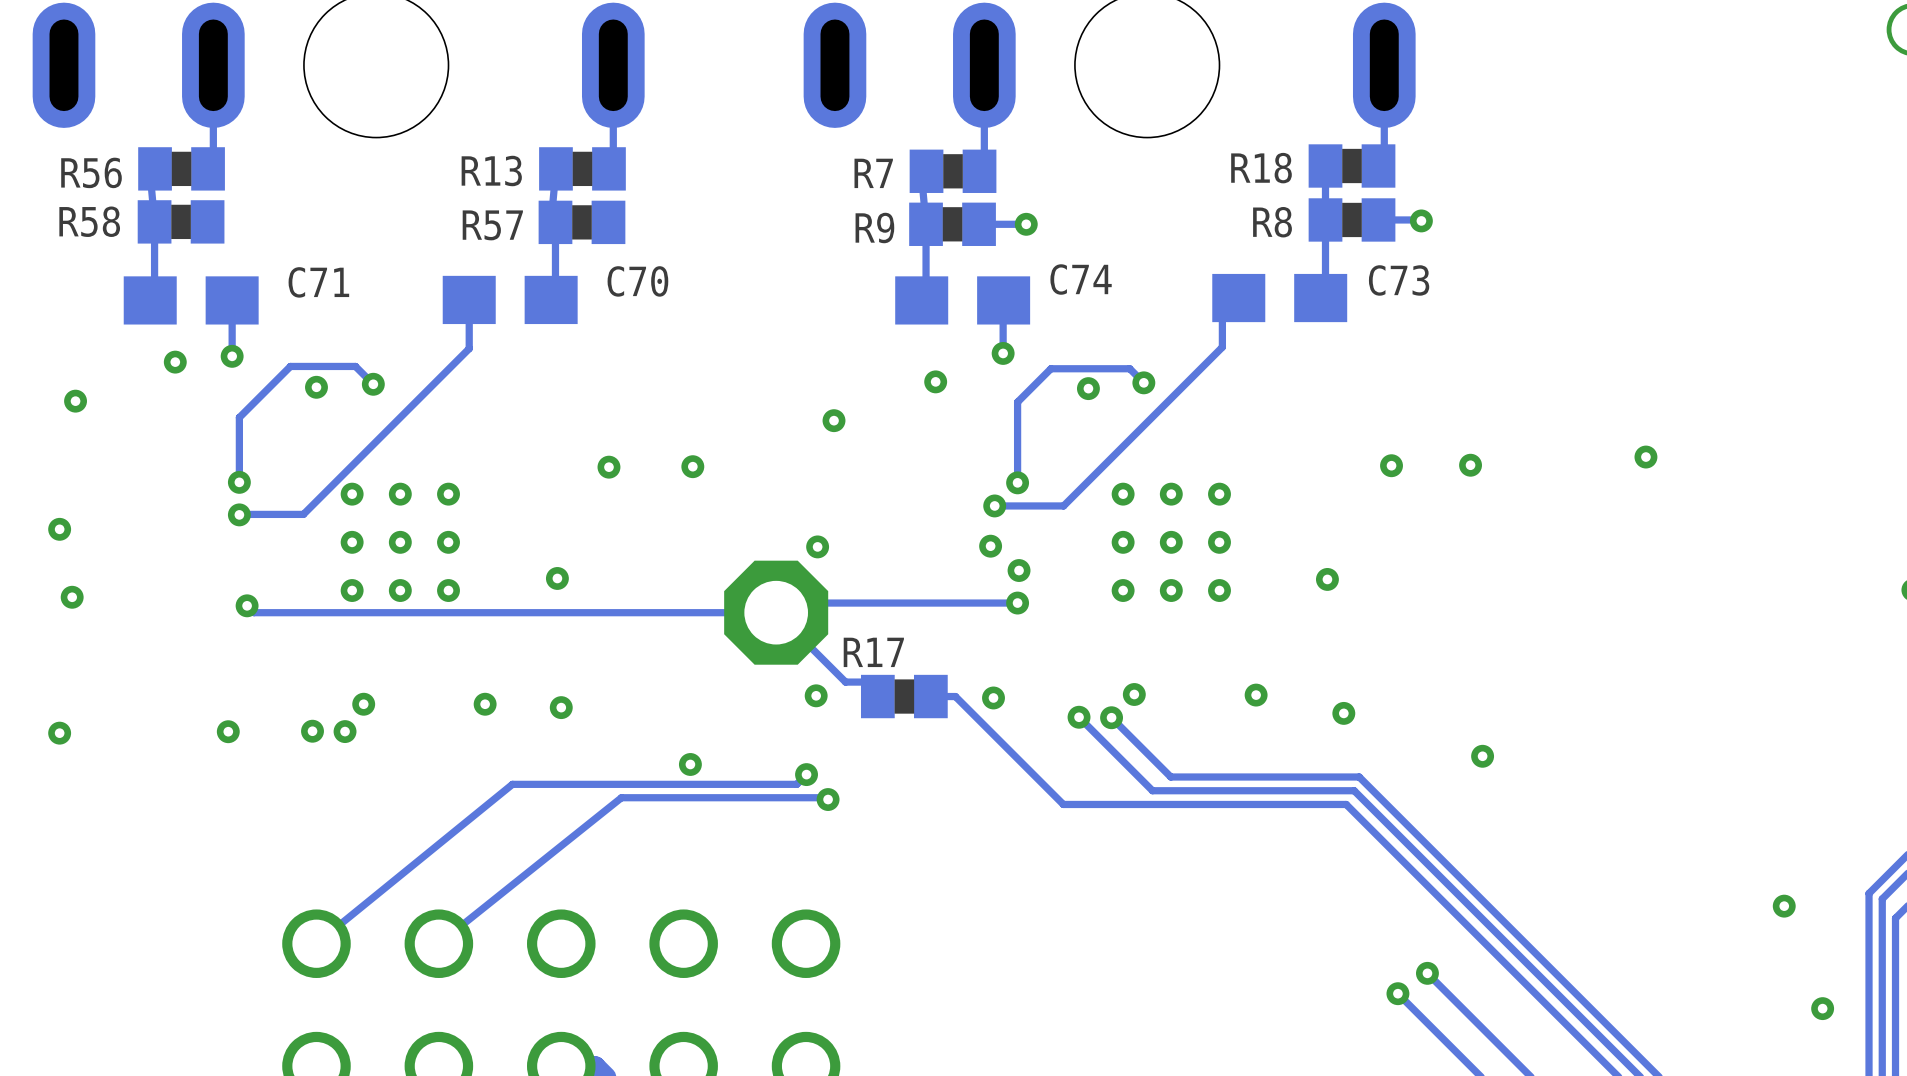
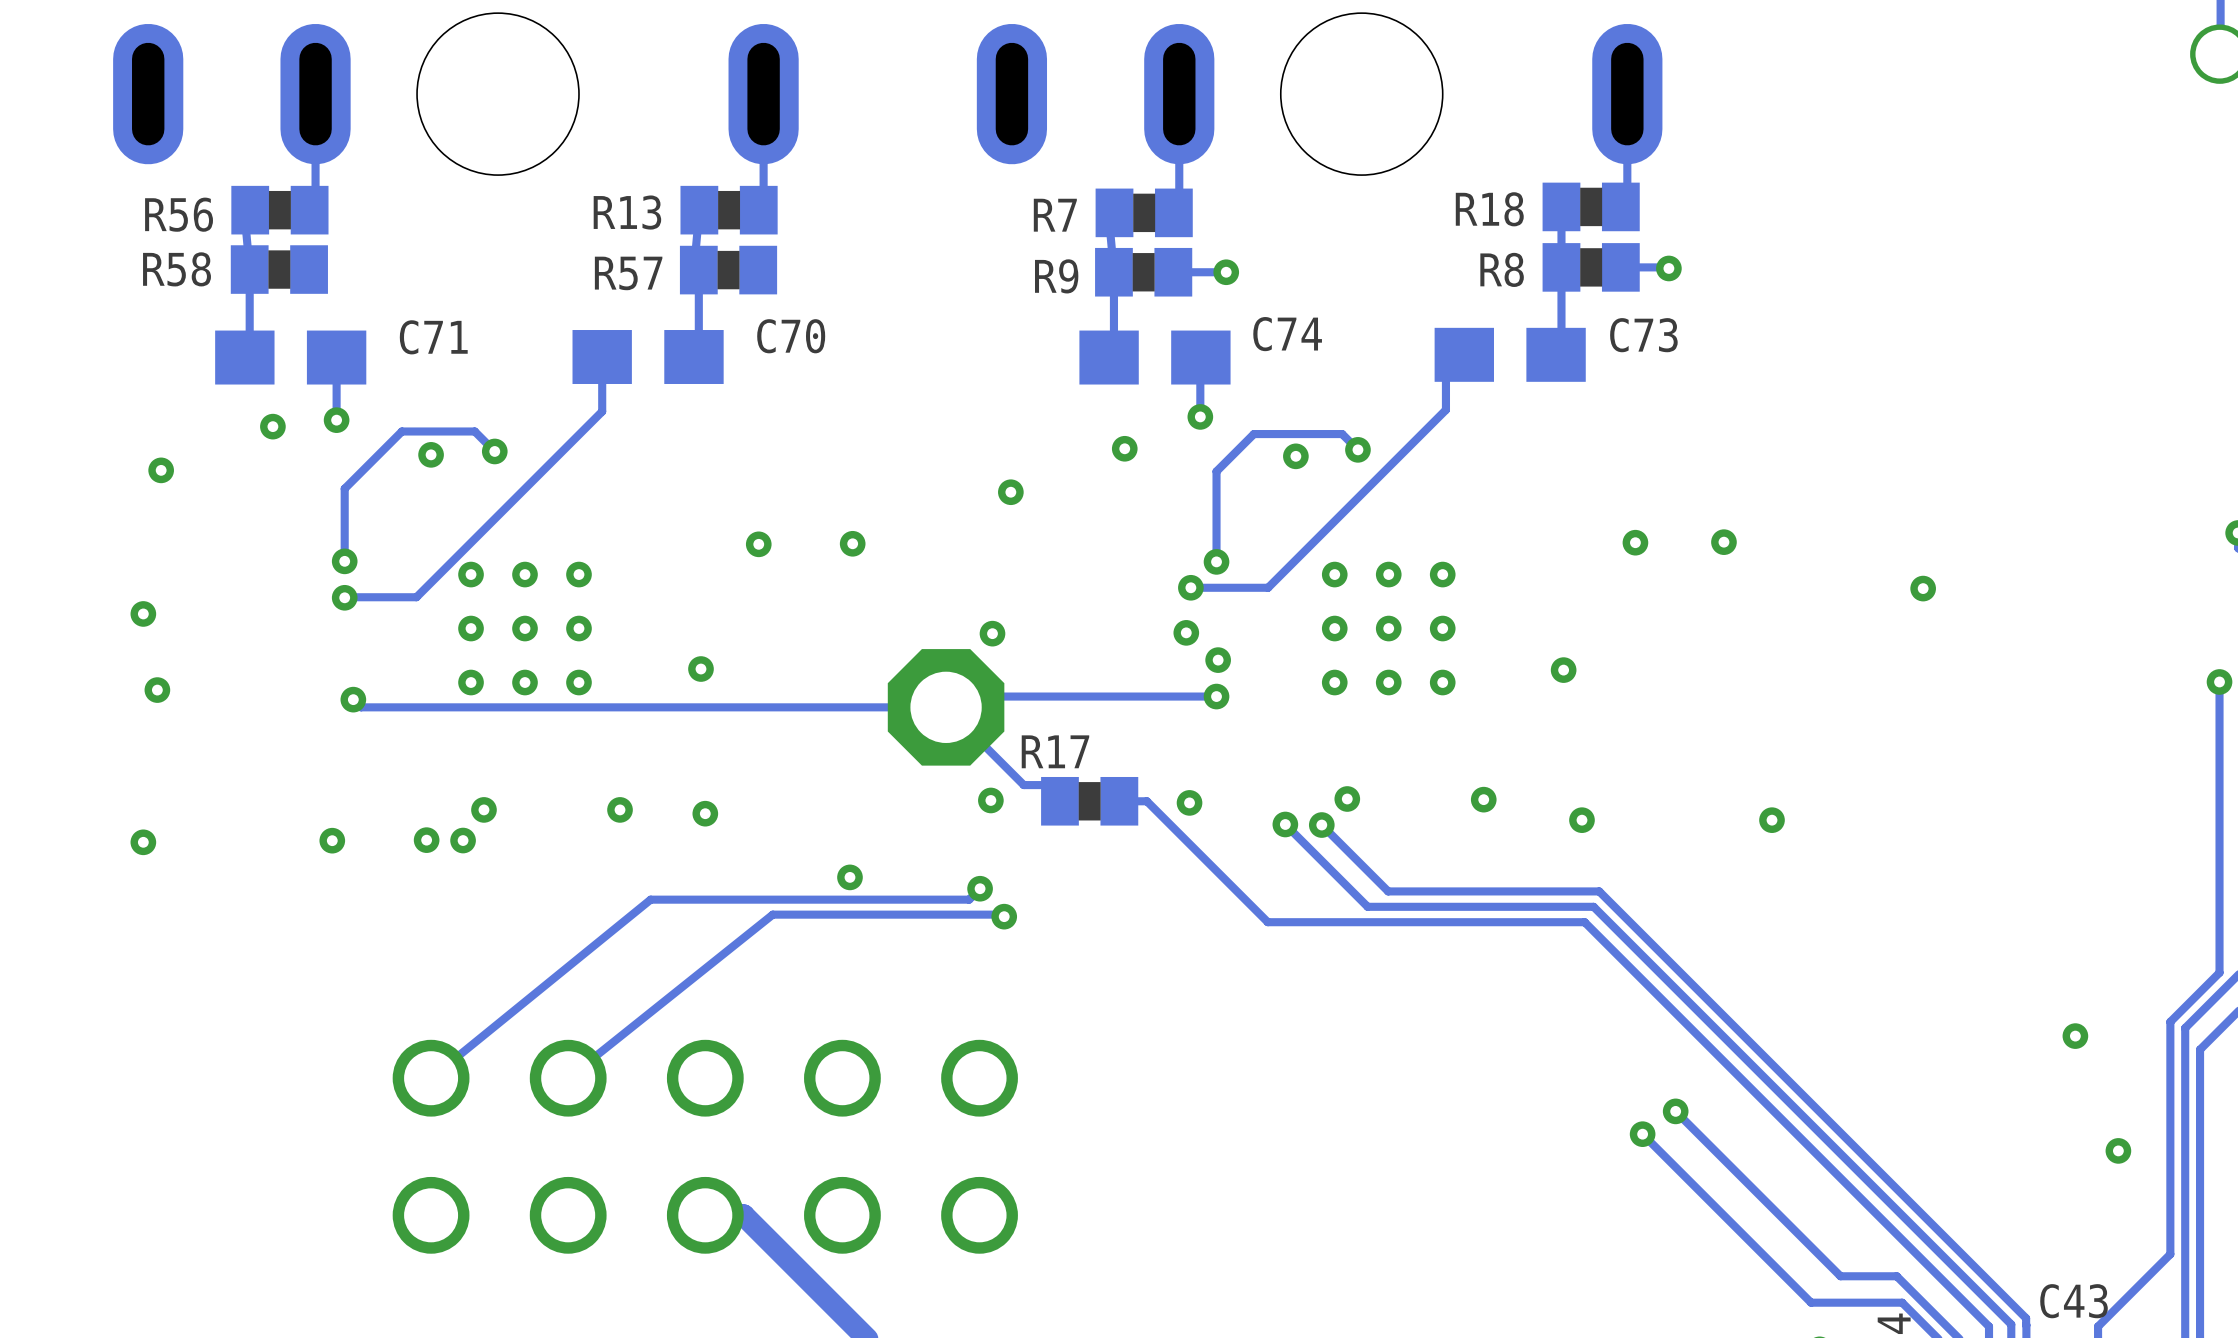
via position: (1645, 457) -> (1923, 588)
via position: (1482, 756) -> (1772, 820)

